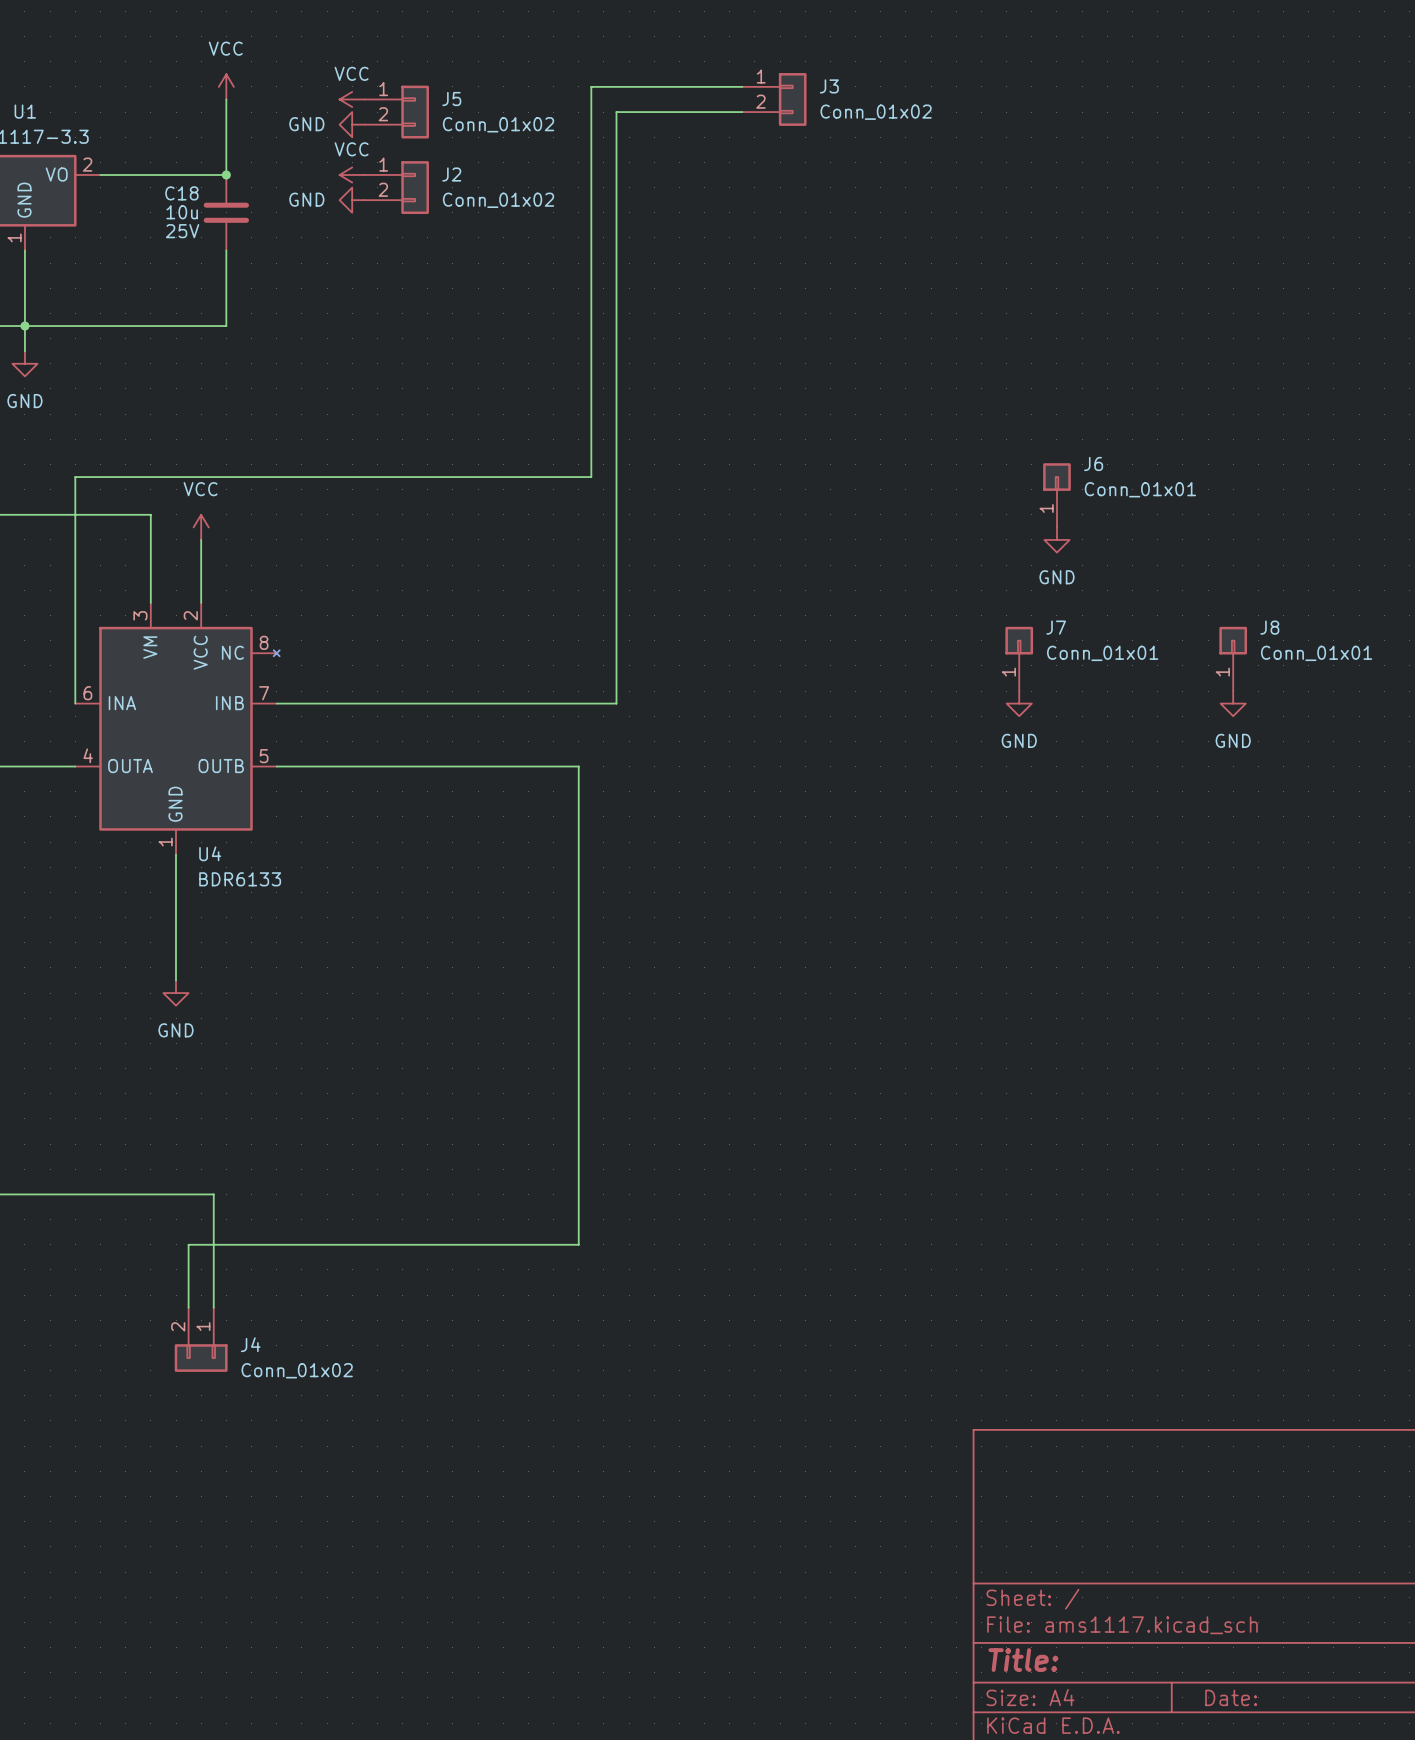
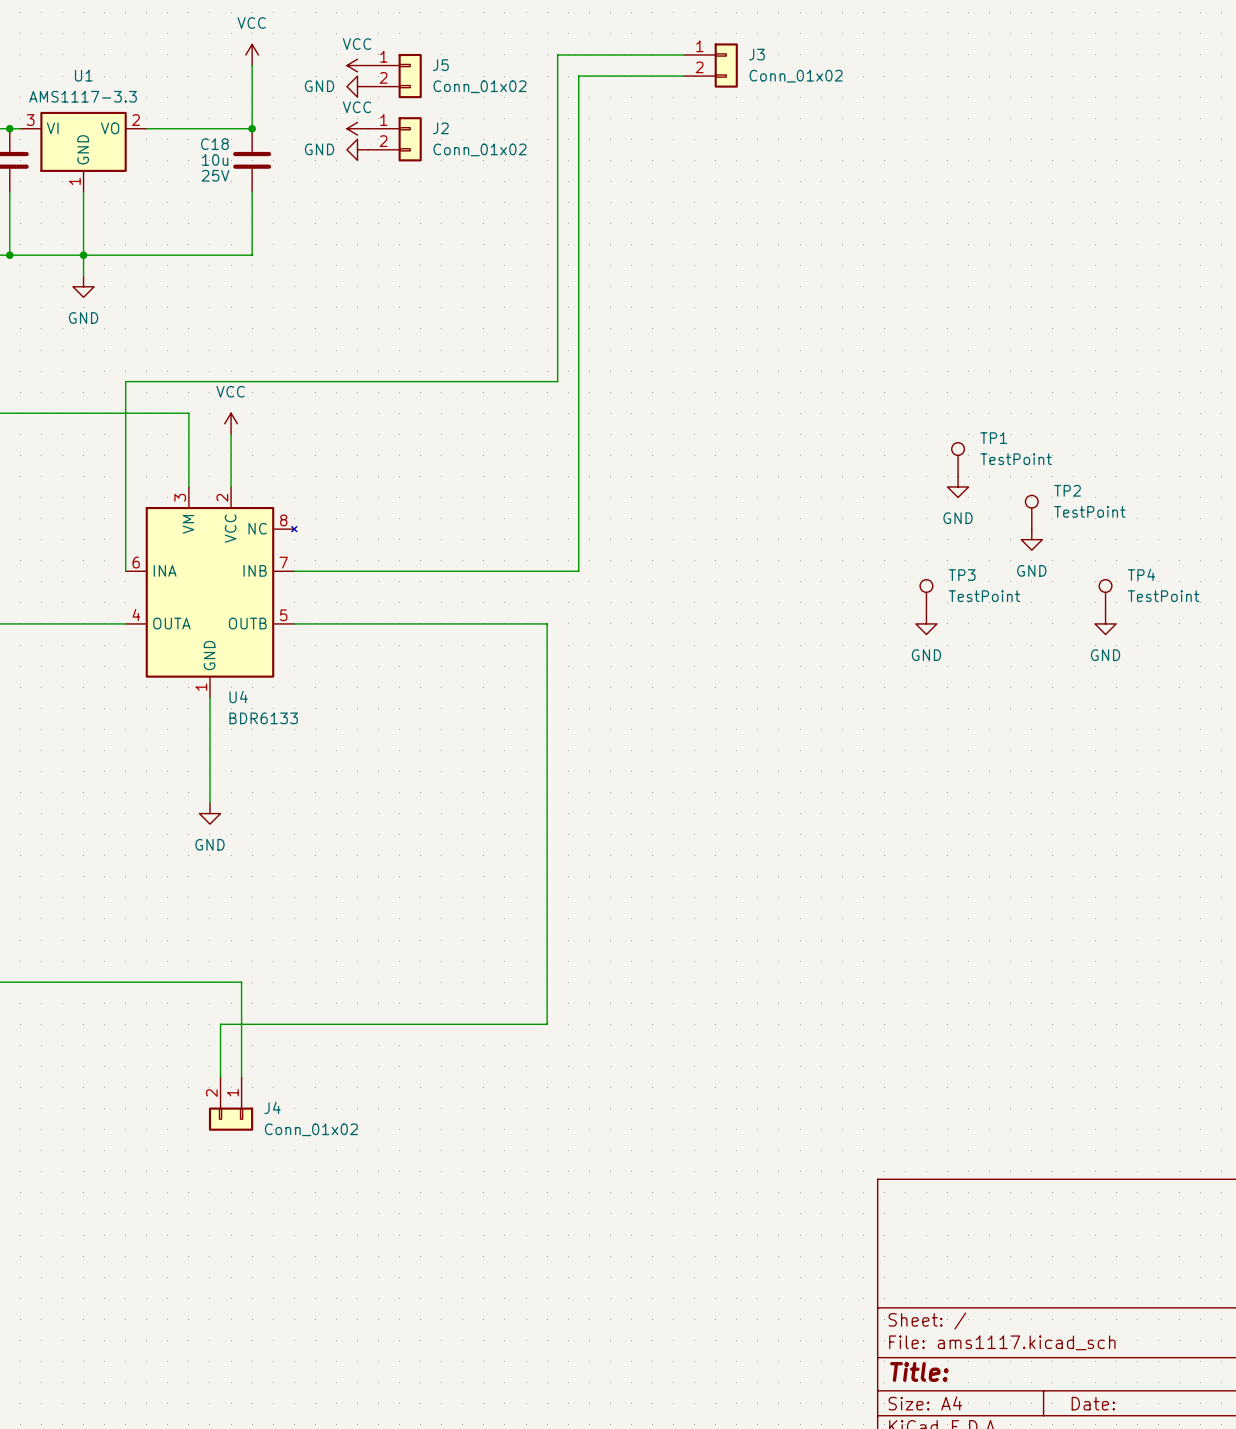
J6: Conn_01x01 (1056, 495) -> none
power symbol: GND (1056, 539) -> none
TP1: none -> TestPoint (958, 459)
power symbol: none -> GND (958, 486)
TP2: none -> TestPoint (1031, 512)
J7: Conn_01x01 (1019, 658) -> none
J8: Conn_01x01 (1233, 658) -> none
power symbol: none -> GND (1031, 539)
power symbol: GND (1019, 703) -> none
power symbol: GND (1233, 703) -> none
TP3: none -> TestPoint (926, 596)
TP4: none -> TestPoint (1105, 596)
power symbol: none -> GND (926, 623)
power symbol: none -> GND (1105, 623)

